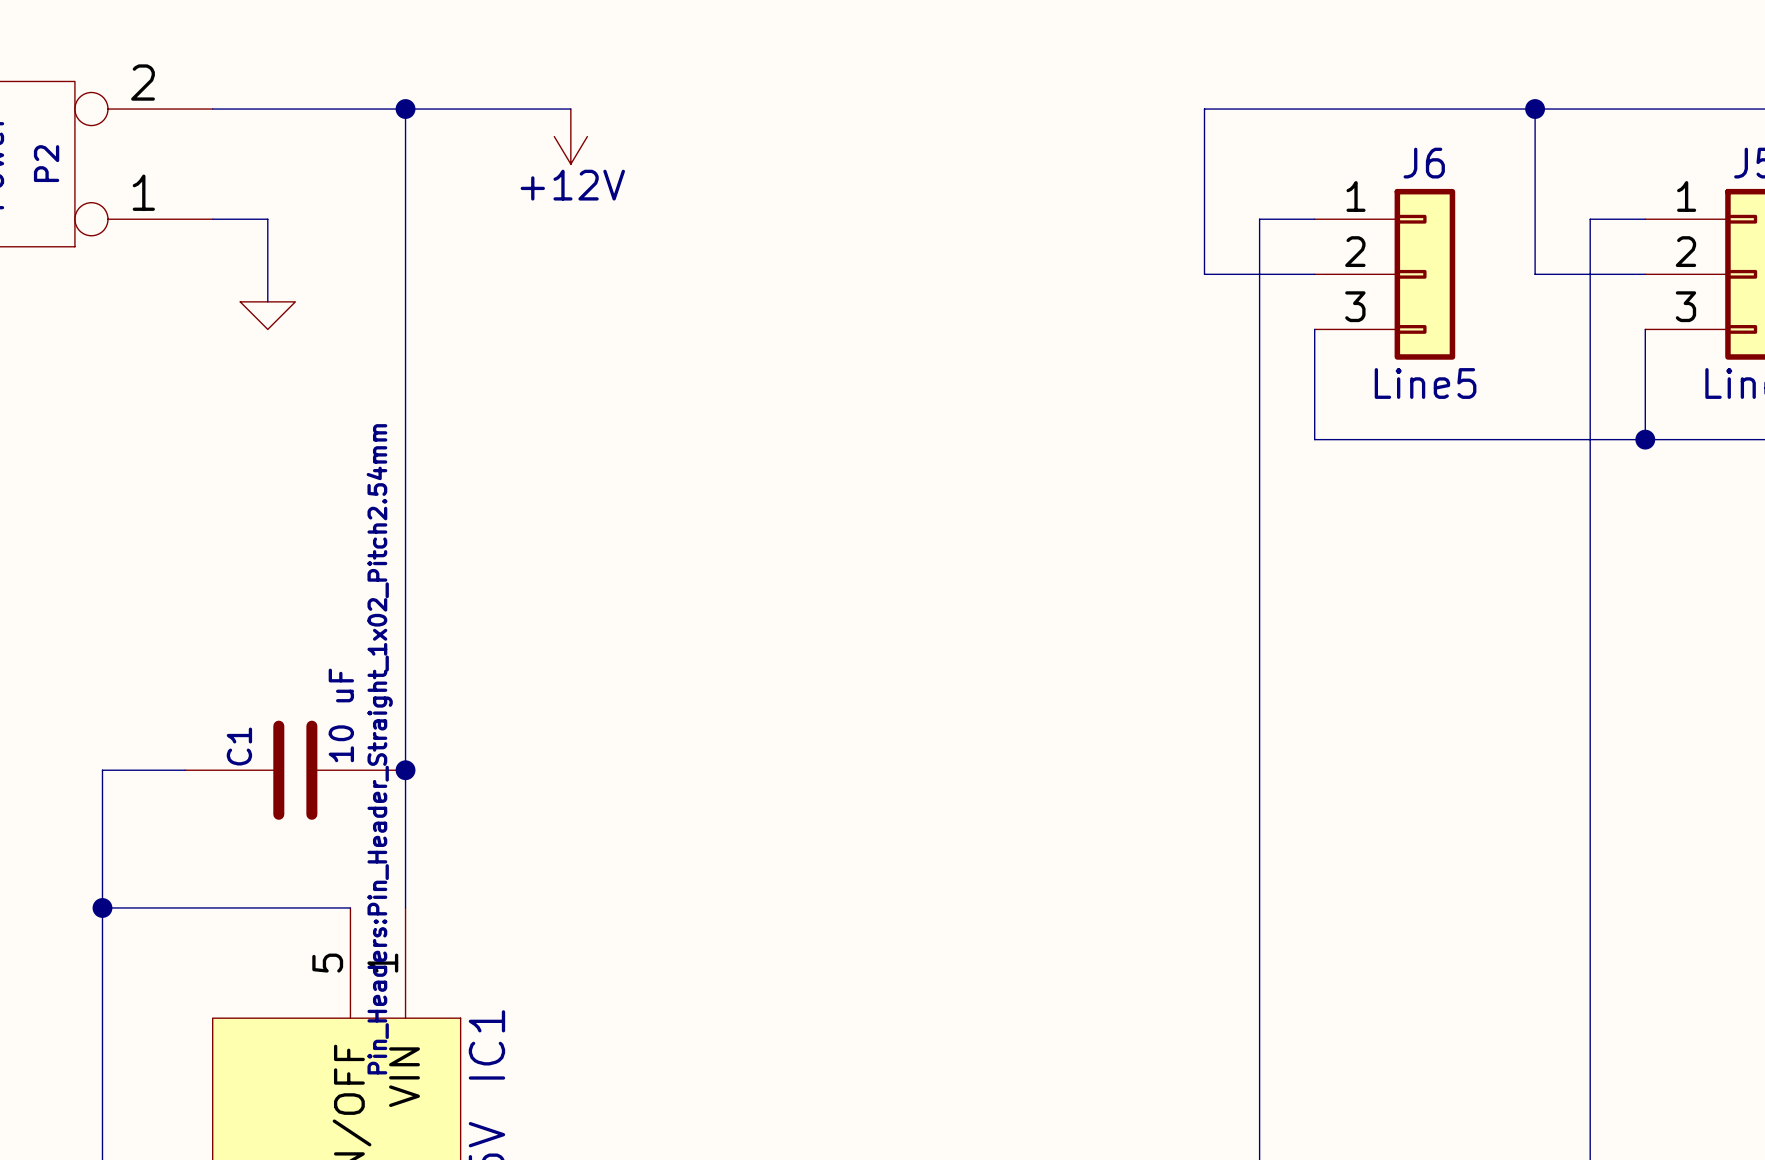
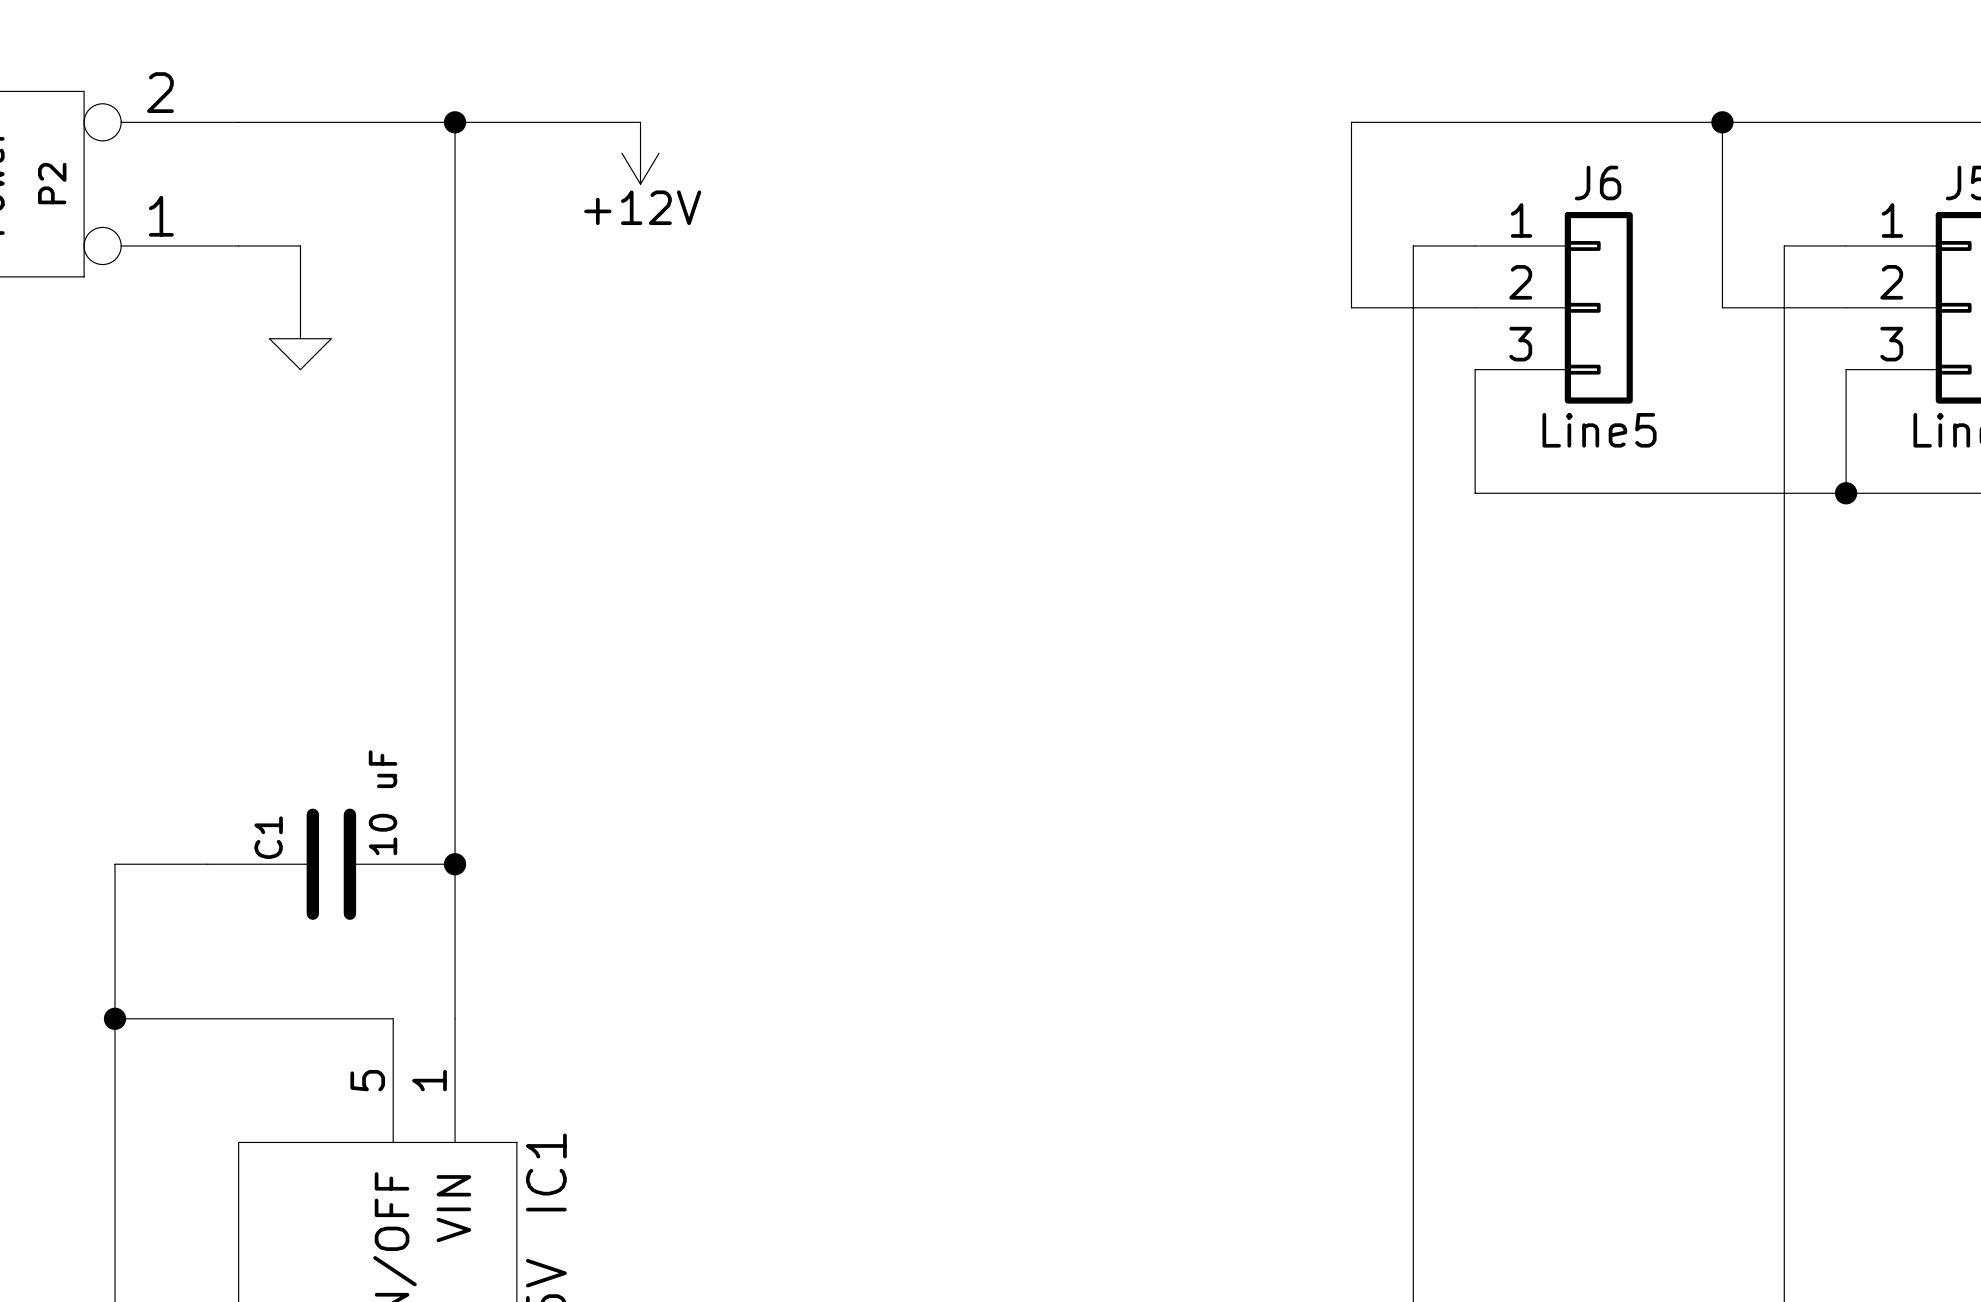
C1 text: Pin_Headers:Pin_Header_Straight_1x02_Pitch2.54mm (379, 749) -> none

